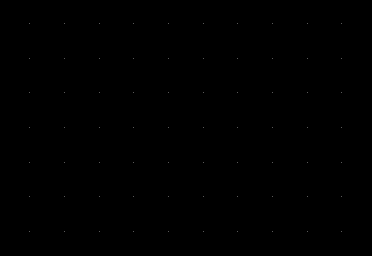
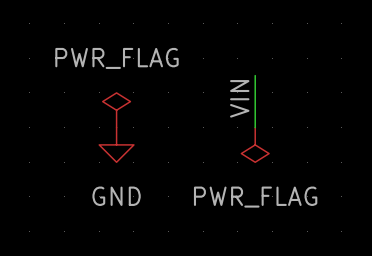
wire: none -> (255, 75) (255, 127)
label: none -> VIN (239, 98)
power symbol: none -> PWR_FLAG (116, 110)
power symbol: none -> GND (116, 144)
power symbol: none -> PWR_FLAG (255, 144)

